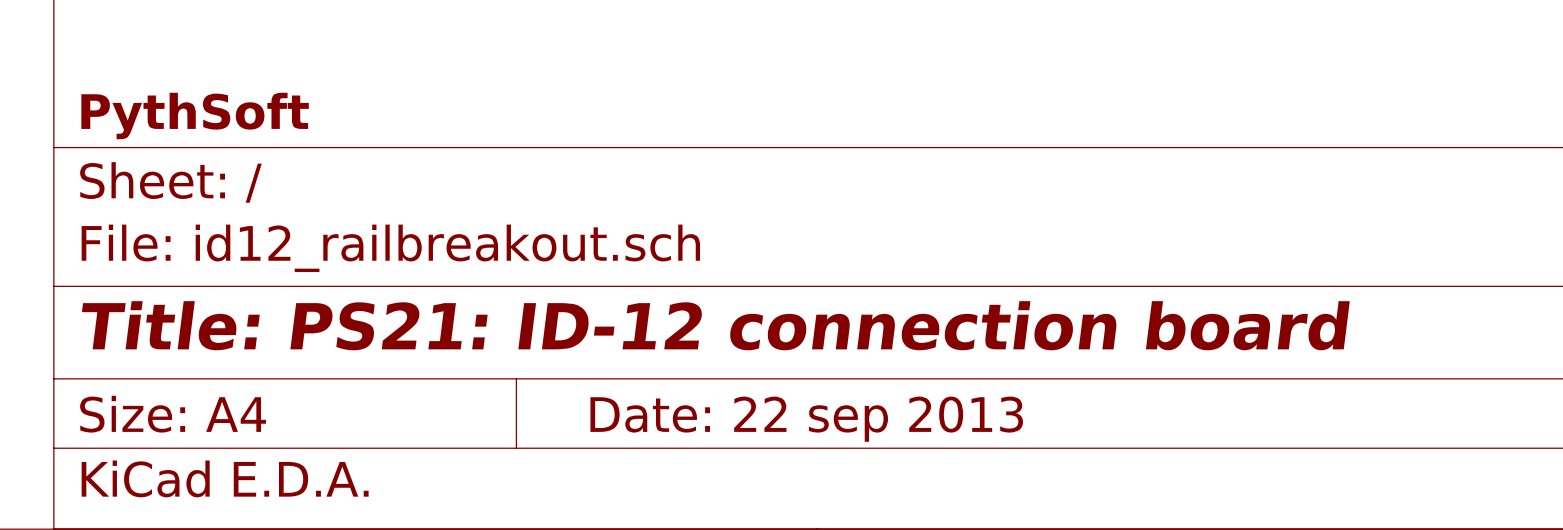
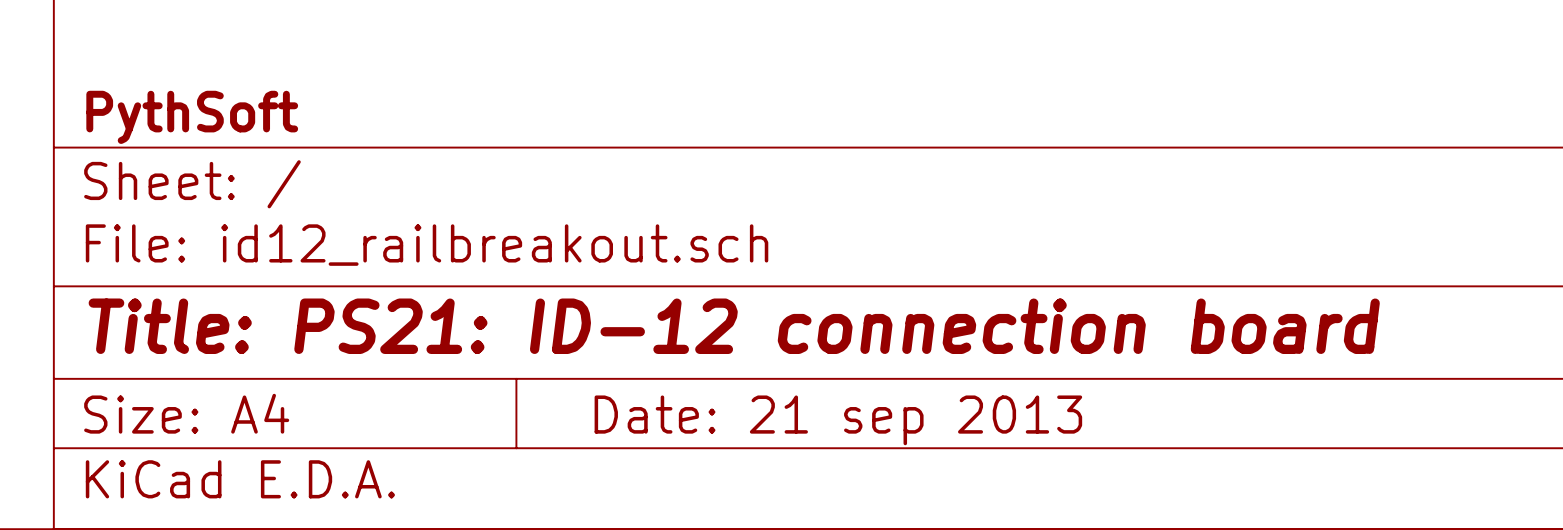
title block: Date: 22 sep 2013 (806, 419) -> Date: 21 sep 2013 (838, 420)

